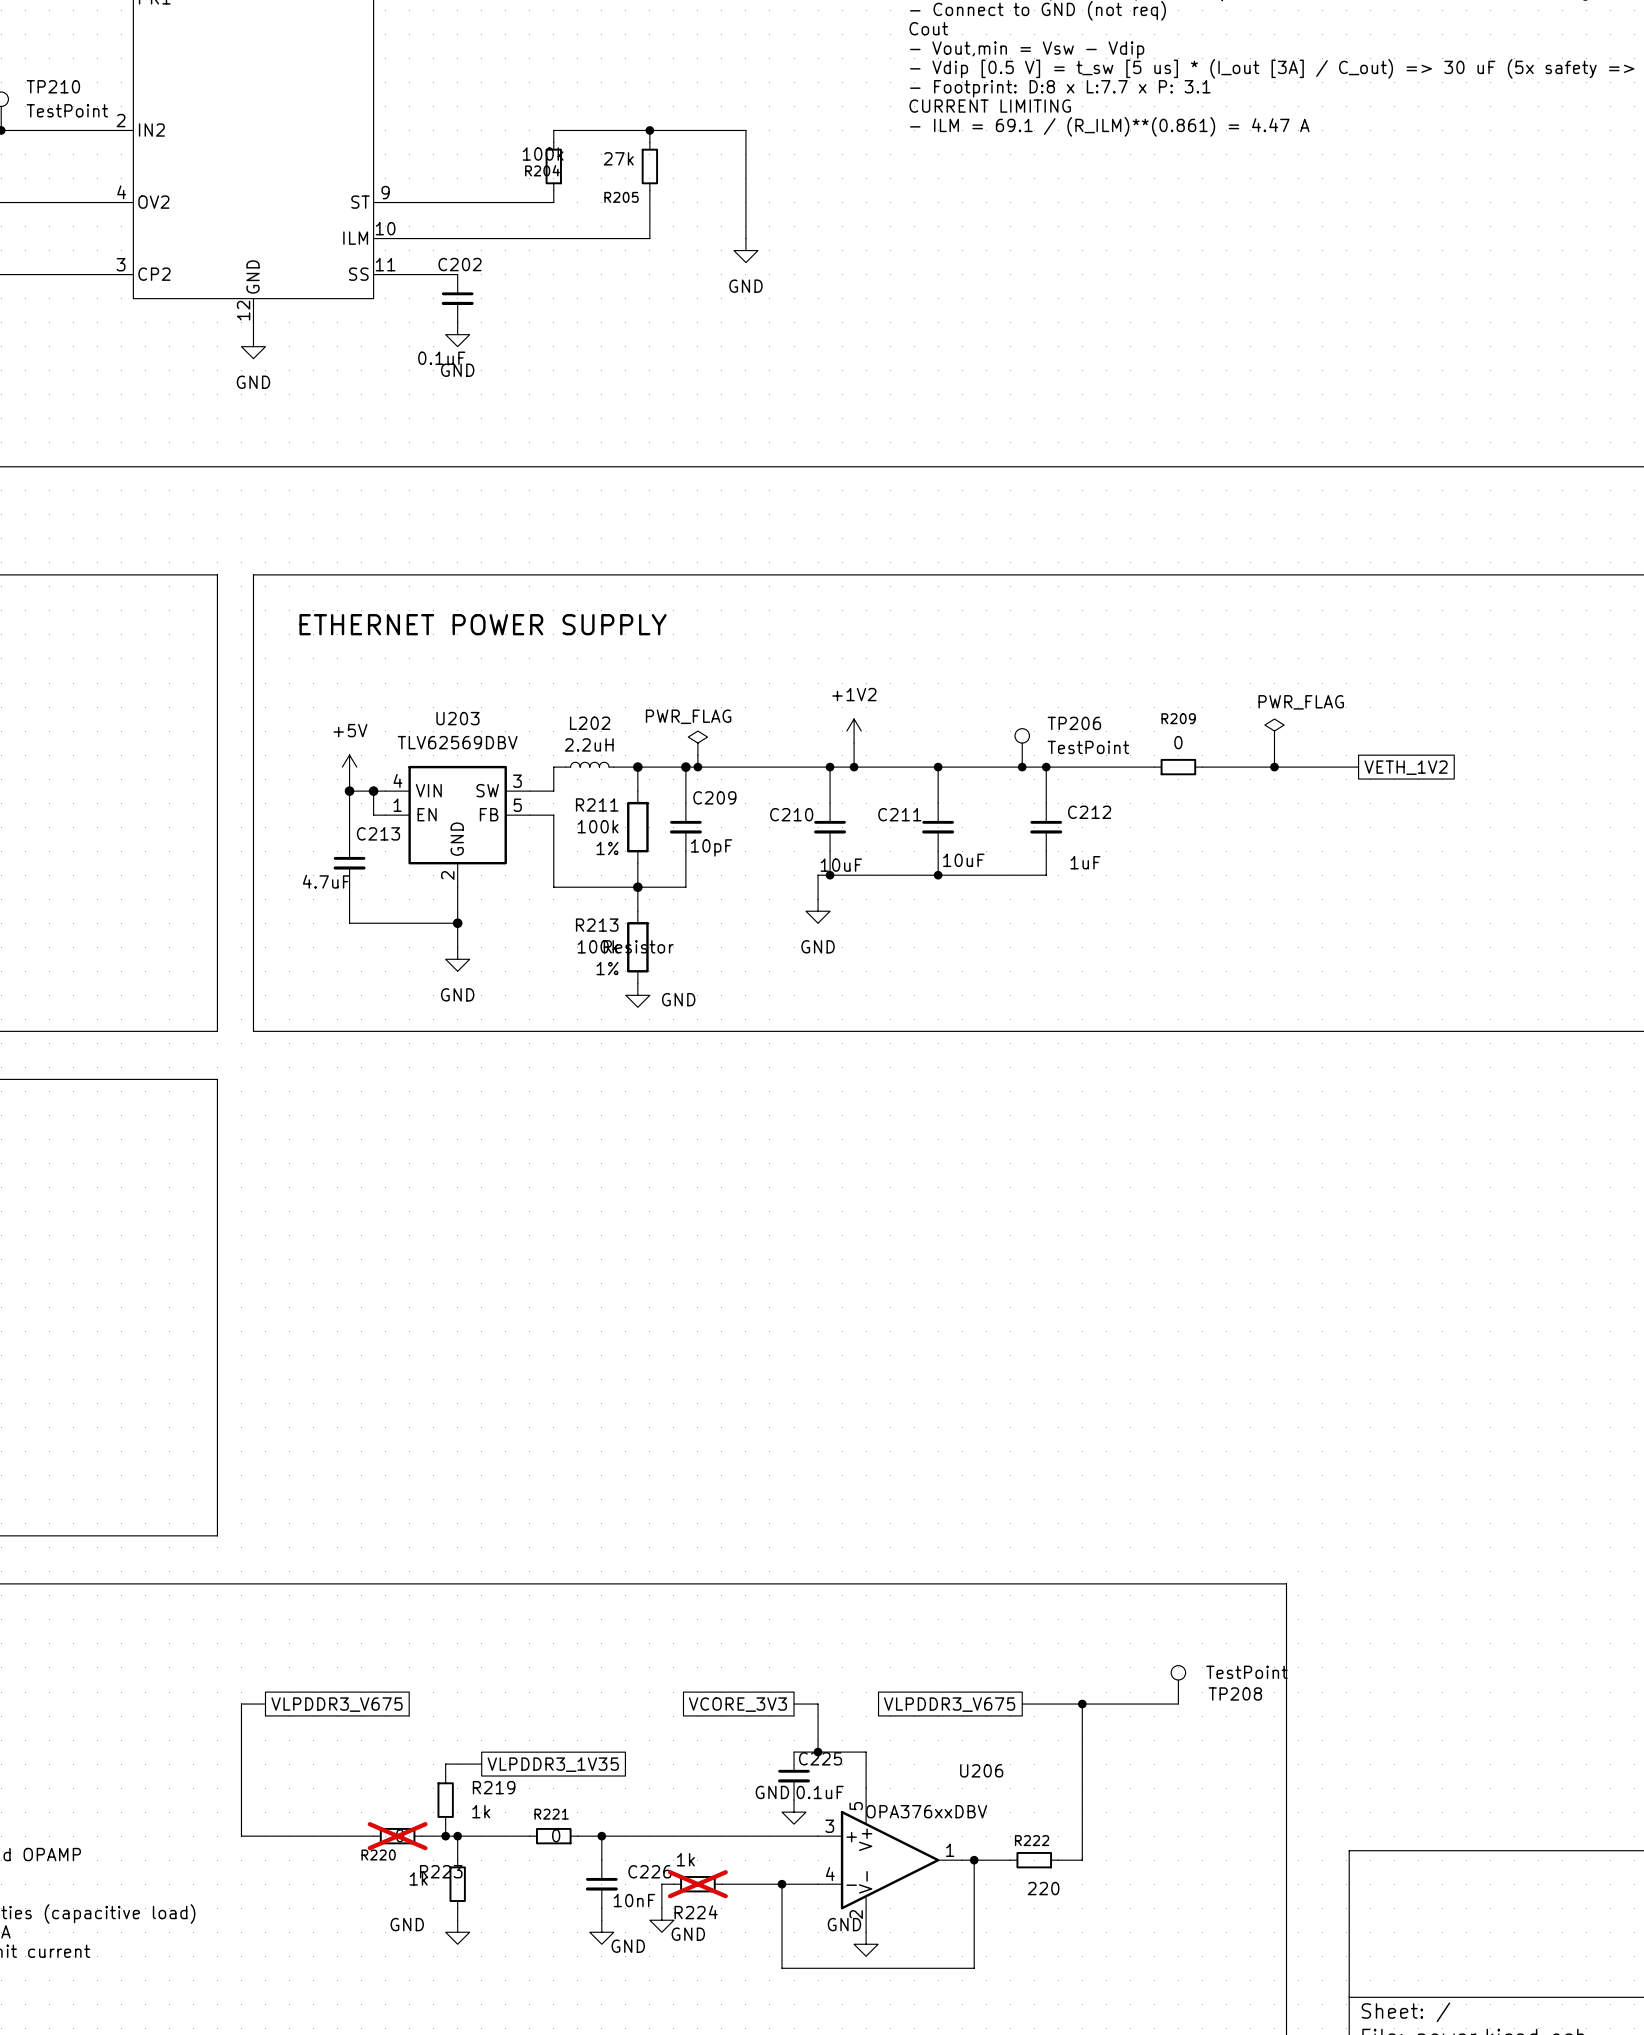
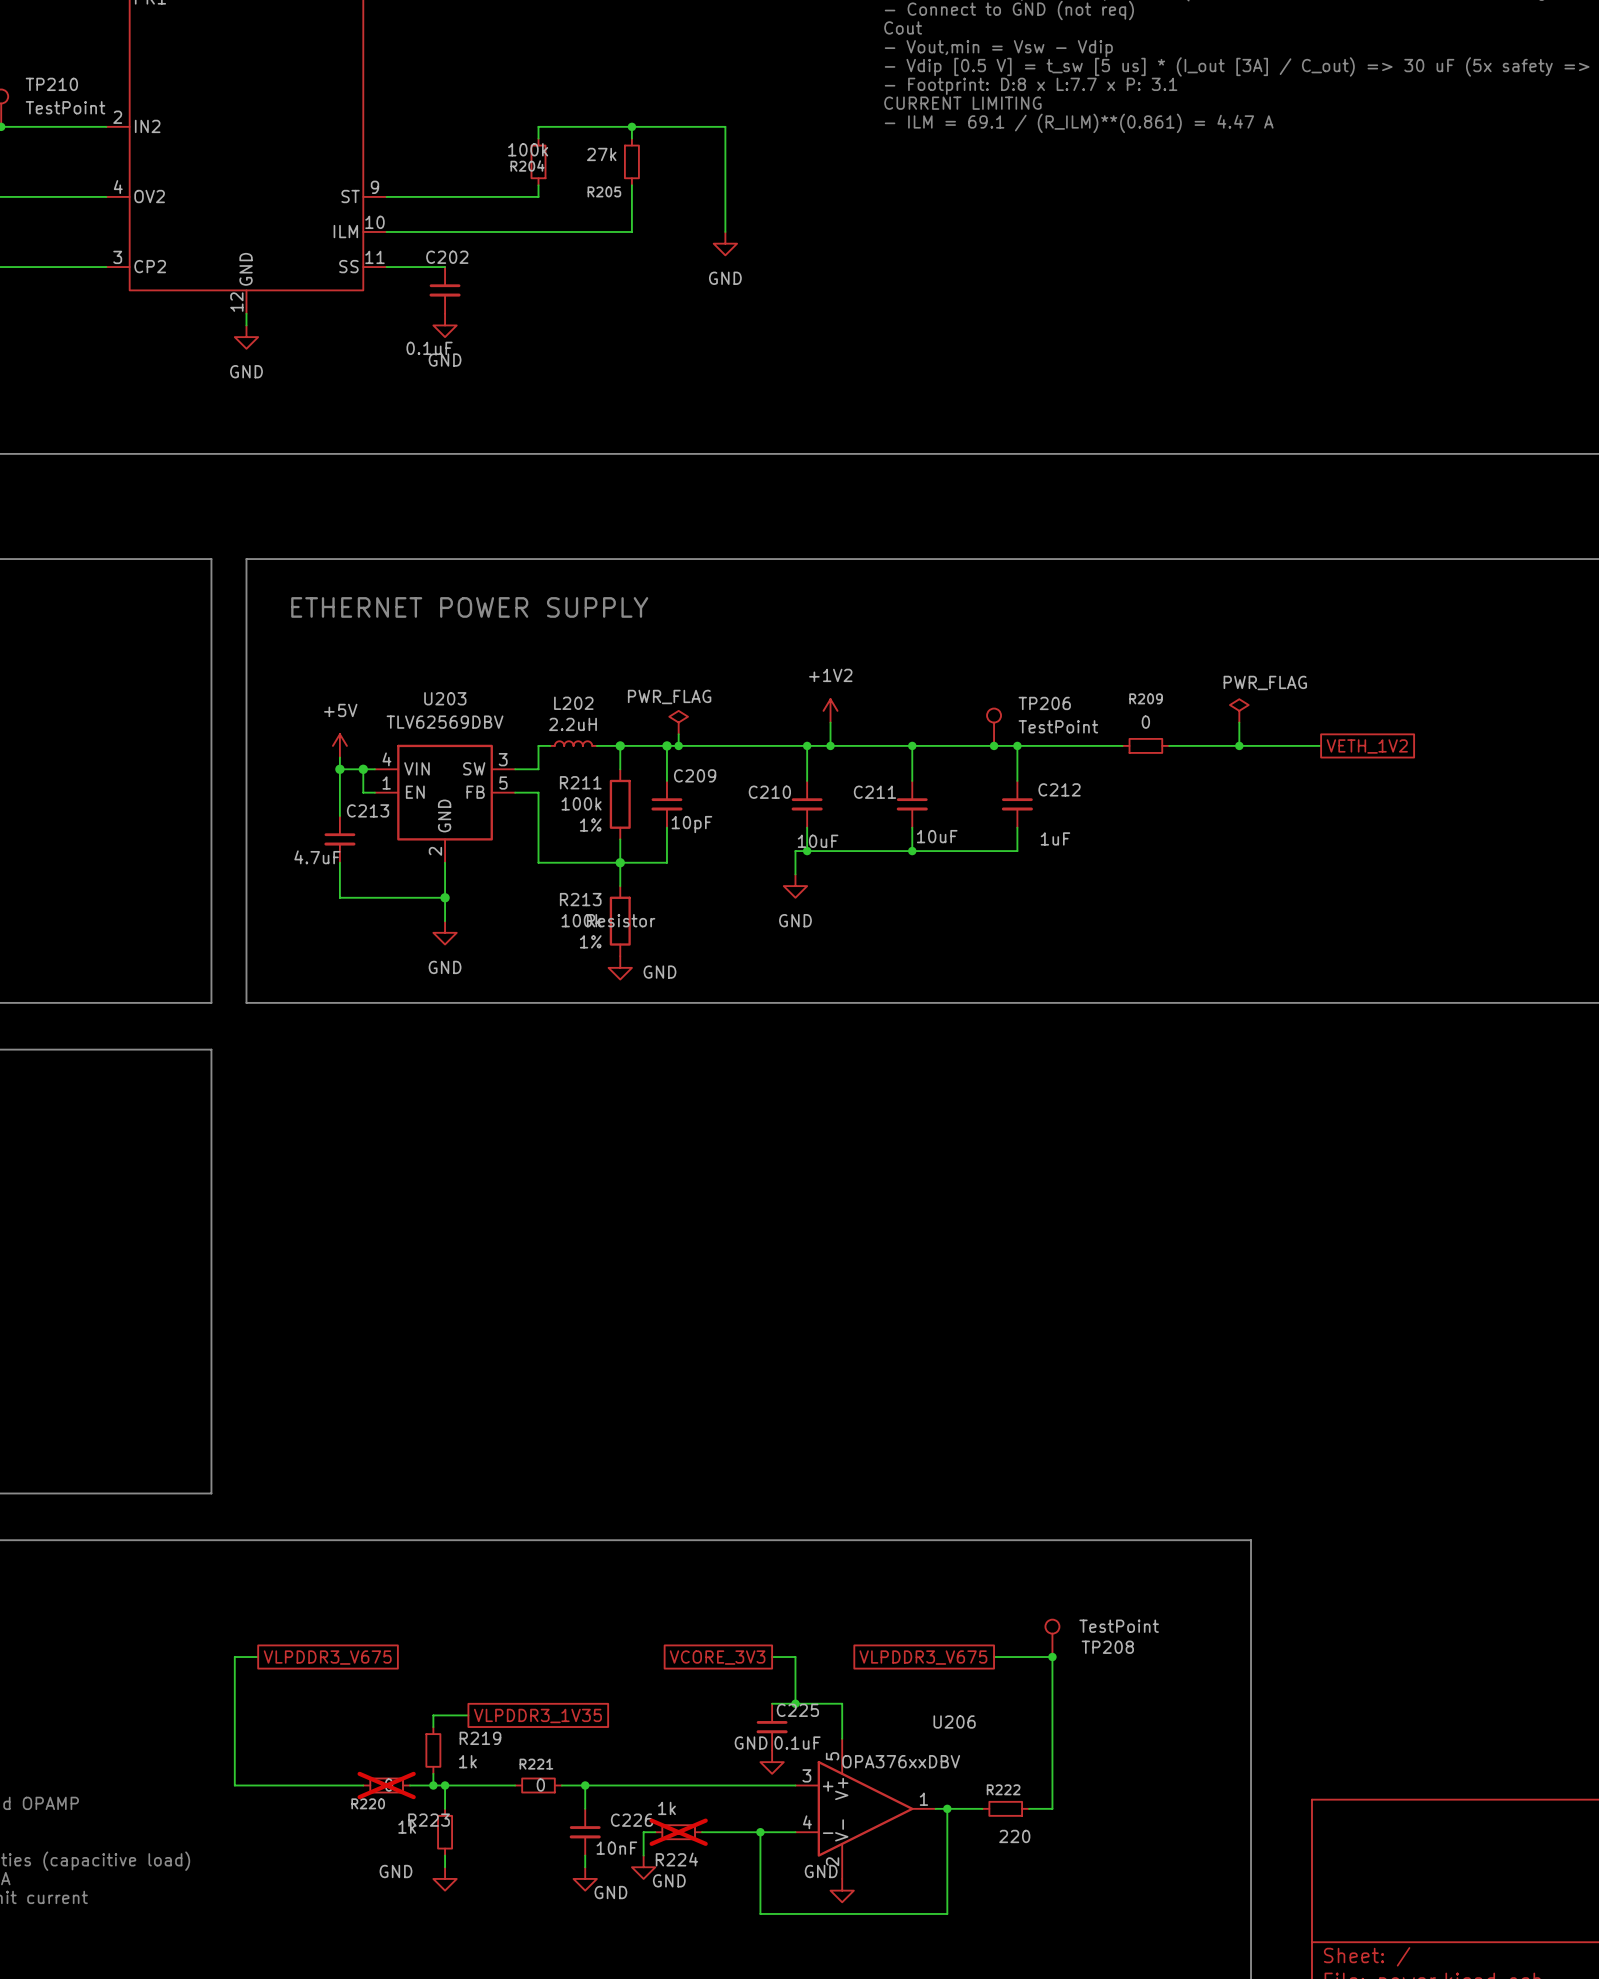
TP208 position: (1178, 1684) -> (1052, 1638)
wire: (1082, 1704) (1178, 1704) -> none

